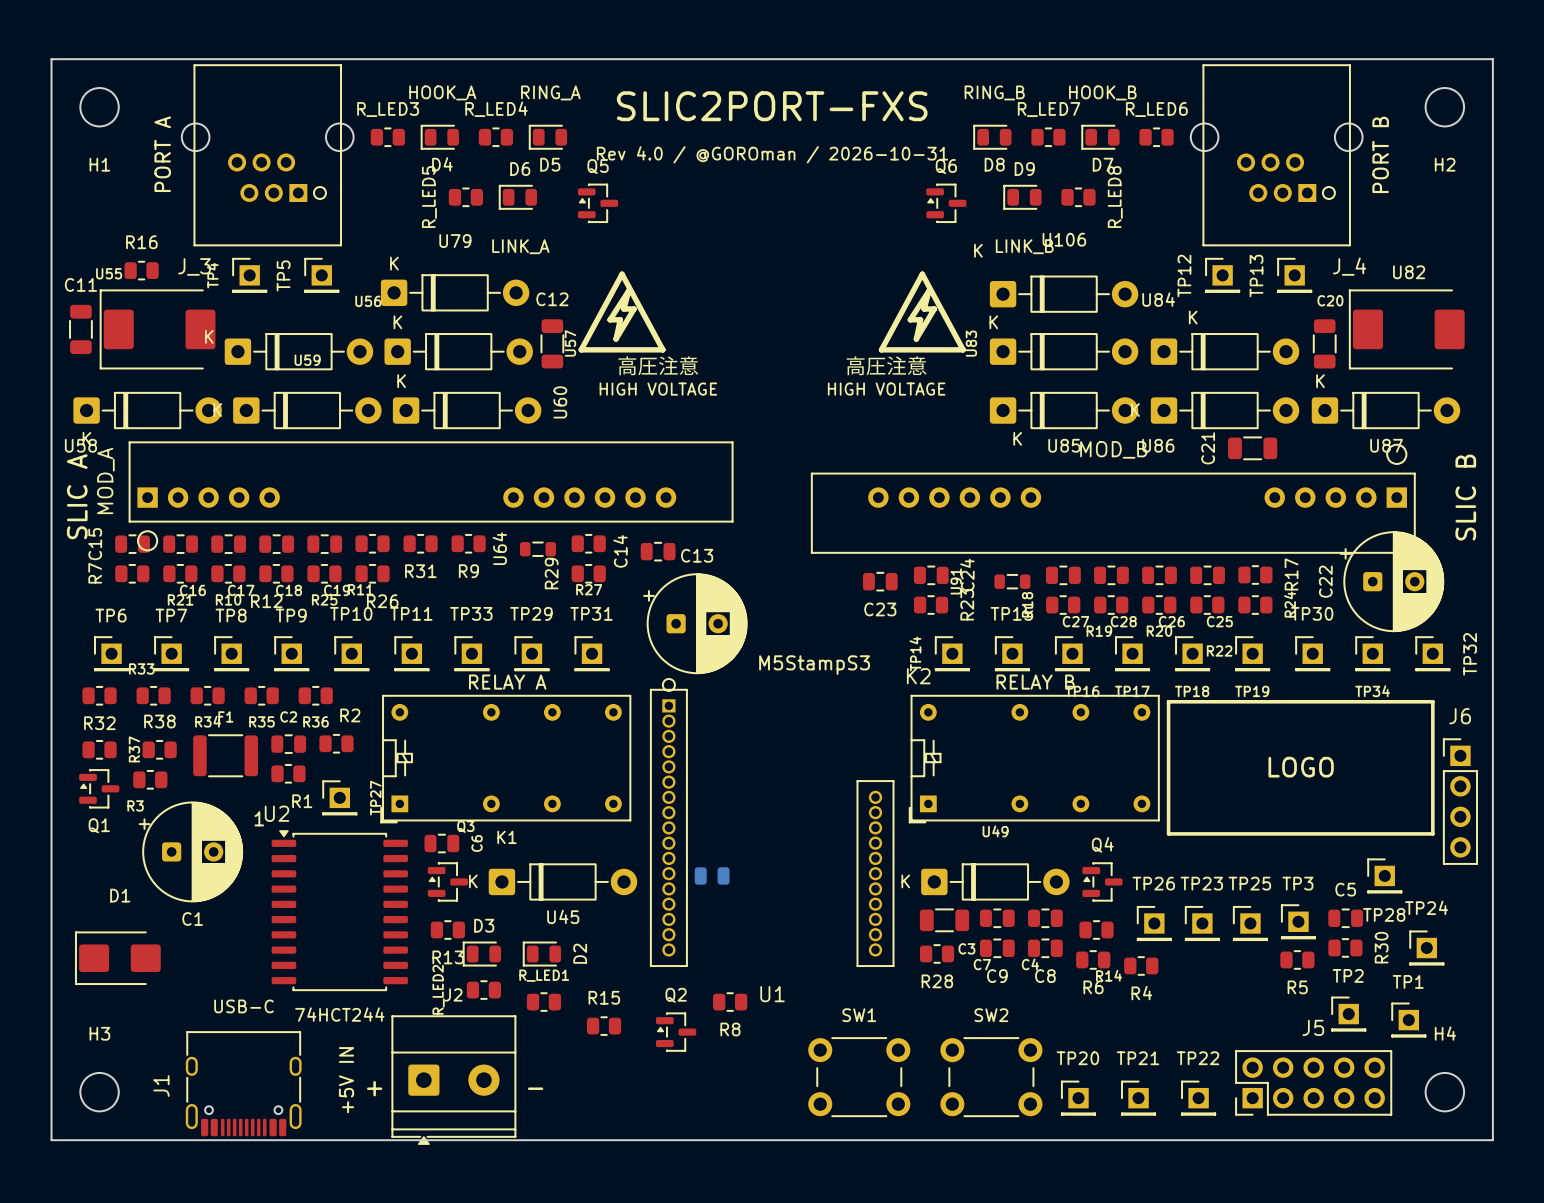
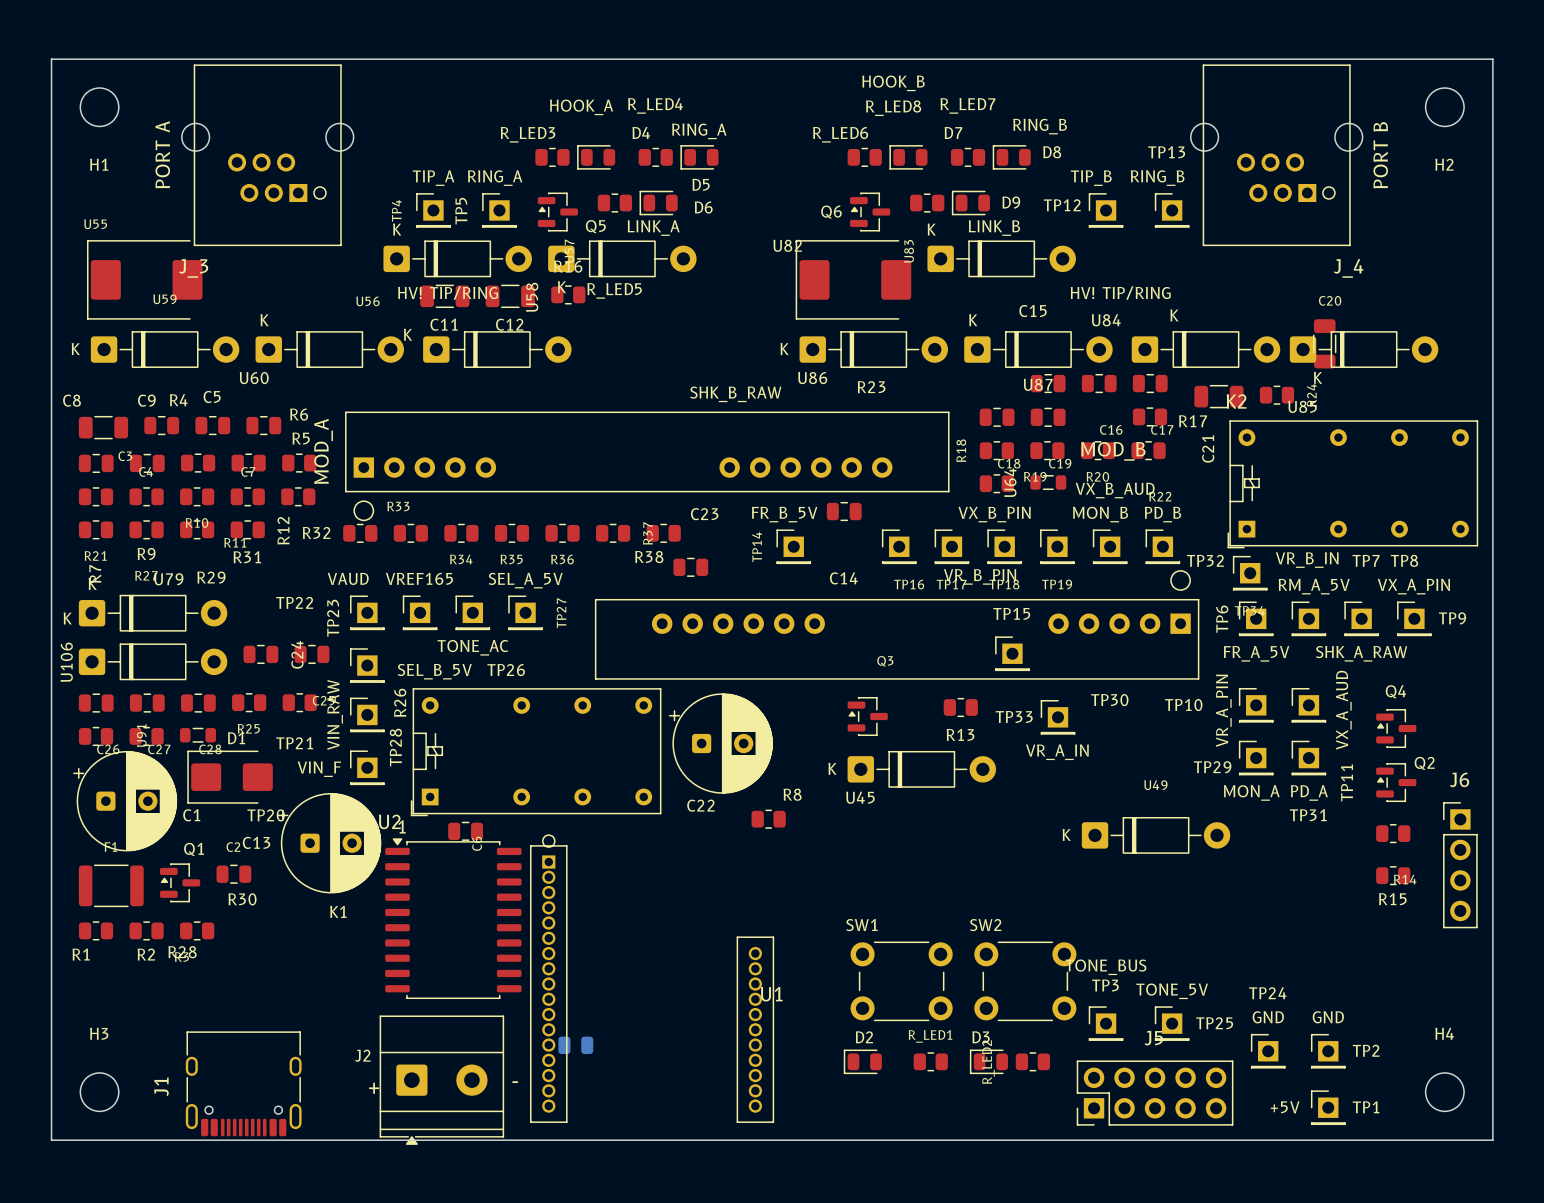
text position: HOOK_A (442, 92) -> HOOK_A (581, 107)
text position: RING_A (550, 92) -> RING_A (699, 131)
text position: RING_B (994, 92) -> RING_B (1040, 126)
text position: HOOK_B (1102, 92) -> HOOK_B (893, 83)
text: SLIC2PORT-FXS (772, 106) -> none
R_LED3 name position: R_LED3 (388, 109) -> R_LED3 (528, 134)
R_LED4 name position: R_LED4 (496, 109) -> R_LED4 (655, 105)
R_LED7 name position: R_LED7 (1049, 109) -> R_LED7 (967, 105)
R_LED6 name position: R_LED6 (1156, 109) -> R_LED6 (840, 134)
R_LED3 position: (387, 137) -> (552, 157)
D4 position: (439, 137) -> (596, 157)
R_LED4 position: (495, 137) -> (655, 157)
D5 position: (548, 137) -> (699, 157)
D8 position: (992, 137) -> (1011, 157)
R_LED7 position: (1048, 137) -> (968, 157)
D7 position: (1100, 137) -> (908, 157)
R_LED6 position: (1156, 137) -> (864, 157)
text: Rev 4.0 / @GOROman / 2026-10-31 (772, 154) -> none
D4 name position: D4 (442, 164) -> D4 (641, 132)
D8 name position: D8 (994, 164) -> D8 (1052, 152)
D7 name position: D7 (1103, 164) -> D7 (953, 132)
Q5 name position: Q5 (598, 166) -> Q5 (595, 226)
Q6 name position: Q6 (946, 166) -> Q6 (831, 212)
D6 name position: D6 (520, 168) -> D6 (703, 207)
D9 name position: D9 (1024, 168) -> D9 (1011, 202)
TP4 value: none -> TIP_A (433, 178)
TP5 value: none -> RING_A (495, 178)
TP12 value: none -> TIP_B (1091, 178)
TP13 value: none -> RING_B (1157, 178)
R_LED5 name rotation: 0° (429, 197) -> 90° clockwise (614, 290)
R_LED5 name position: R_LED5 (429, 197) -> R_LED5 (614, 290)
R_LED5 position: (465, 197) -> (614, 203)
D6 position: (518, 197) -> (658, 203)
D9 position: (1022, 197) -> (970, 203)
R_LED8 position: (1078, 197) -> (927, 203)
R_LED8 name rotation: 0° (1115, 197) -> 90° clockwise (893, 108)
R_LED8 name position: R_LED8 (1115, 197) -> R_LED8 (893, 108)
Q5 position: (598, 203) -> (557, 212)
Q6 position: (946, 203) -> (870, 212)
U106 name rotation: 0° (1064, 239) -> 90° counterclockwise (66, 662)
U106 name position: U106 (1064, 239) -> U106 (66, 662)
U79 name position: U79 (455, 241) -> U79 (168, 579)
text position: LINK_A (520, 246) -> LINK_A (653, 228)
text position: LINK_B (1024, 246) -> LINK_B (994, 228)
R16 position: (141, 270) -> (568, 294)
U82 name position: U82 (1409, 272) -> U82 (787, 245)
line: (622, 274) (581, 349) (662, 349) (622, 274) -> none
line: (922, 274) (881, 349) (963, 349) (922, 274) -> none
TP4 position: (249, 275) -> (433, 210)
TP5 position: (321, 275) -> (499, 210)
TP12 name rotation: 0° (1184, 275) -> 90° clockwise (1062, 205)
TP12 position: (1222, 275) -> (1106, 210)
TP13 name rotation: 0° (1256, 275) -> 90° clockwise (1166, 152)
TP13 name position: TP13 (1256, 275) -> TP13 (1166, 152)
TP13 position: (1294, 275) -> (1172, 210)
C11 name position: C11 (80, 284) -> C11 (444, 324)
line: (628, 291) (623, 309) (634, 309) (616, 339) (620, 319) (610, 319) (628, 291) -> none
line: (928, 291) (924, 309) (934, 309) (916, 339) (920, 319) (910, 319) (928, 291) -> none
U79 position: (455, 292) -> (153, 613)
text: none -> HV! TIP/RING (448, 293)
U106 position: (1064, 294) -> (153, 661)
text: none -> HV! TIP/RING (1120, 293)
C12 name position: C12 (552, 299) -> C12 (509, 324)
U84 name position: U84 (1158, 299) -> U84 (1106, 320)
C11 rotation: 0° (80, 329) -> 90° clockwise (444, 296)
C11 position: (80, 329) -> (444, 296)
U55 position: (157, 329) -> (144, 279)
U82 position: (1406, 329) -> (853, 279)
C12 rotation: 0° (552, 343) -> 90° clockwise (510, 296)
C12 position: (552, 343) -> (510, 296)
U56 position: (298, 351) -> (497, 349)
U57 position: (458, 351) -> (457, 258)
U83 position: (1064, 351) -> (1001, 258)
U84 position: (1225, 351) -> (1205, 349)
text: 高圧注意 (658, 365) -> none
text: 高圧注意 (886, 365) -> none
text: HIGH VOLTAGE (658, 389) -> none
text: HIGH VOLTAGE (886, 389) -> none
TP16 value: none -> SHK_B_RAW (735, 394)
U60 name rotation: 0° (560, 402) -> 90° clockwise (254, 378)
U60 name position: U60 (560, 402) -> U60 (254, 378)
U58 position: (147, 410) -> (622, 258)
U59 position: (307, 410) -> (165, 349)
U60 position: (467, 410) -> (329, 349)
U85 position: (1064, 410) -> (1364, 349)
U86 position: (1225, 410) -> (873, 349)
U87 position: (1385, 410) -> (1038, 349)
U58 name rotation: 0° (80, 445) -> 90° counterclockwise (532, 297)
U85 name position: U85 (1064, 445) -> U85 (1302, 406)
U86 name position: U86 (1158, 445) -> U86 (812, 378)
C21 position: (1252, 448) -> (1218, 396)
TP19 value: none -> VX_B_AUD (1115, 490)
text: SLIC A (77, 496) -> none
MOD_A position: (431, 496) -> (647, 466)
text: SLIC B (1465, 497) -> none
MOD_B position: (1113, 498) -> (897, 624)
TP14 value: none -> FR_B_5V (784, 514)
TP17 value: none -> VX_B_PIN (994, 514)
TP30 value: none -> MON_B (1100, 514)
TP32 value: none -> PD_B (1162, 514)
R11 position: (372, 543) -> (247, 496)
R31 position: (420, 543) -> (247, 529)
R9 position: (468, 543) -> (146, 496)
R27 position: (588, 543) -> (146, 529)
C15 name rotation: 0° (95, 544) -> 90° clockwise (1033, 311)
C15 name position: C15 (95, 544) -> C15 (1033, 311)
C15 position: (132, 544) -> (1048, 383)
C16 position: (180, 544) -> (1099, 383)
C17 position: (228, 544) -> (1150, 383)
C18 position: (276, 544) -> (997, 417)
C19 position: (324, 544) -> (1048, 417)
U64 position: (537, 549) -> (1048, 482)
C14 name rotation: 0° (620, 551) -> 90° clockwise (843, 578)
C14 name position: C14 (620, 551) -> C14 (843, 578)
C14 position: (658, 551) -> (844, 511)
C13 name position: C13 (697, 555) -> C13 (256, 842)
TP34 value: none -> VR_B_IN (1307, 560)
R9 name position: R9 (468, 571) -> R9 (146, 554)
R7 position: (132, 573) -> (96, 496)
R21 position: (180, 573) -> (96, 529)
R10 position: (228, 573) -> (197, 496)
R12 position: (276, 573) -> (298, 496)
R25 position: (324, 573) -> (249, 702)
R26 position: (372, 573) -> (299, 702)
R29 name rotation: 0° (551, 573) -> 90° clockwise (211, 577)
R29 name position: R29 (551, 573) -> R29 (211, 577)
R29 position: (588, 573) -> (197, 529)
R17 name rotation: 0° (1291, 574) -> 90° clockwise (1193, 421)
C24 position: (931, 575) -> (260, 654)
TP18 value: none -> VR_B_PIN (980, 576)
C27 position: (1063, 575) -> (147, 703)
C28 position: (1111, 575) -> (198, 703)
C26 position: (1159, 575) -> (96, 703)
C25 position: (1207, 575) -> (311, 654)
R17 position: (1255, 575) -> (1150, 416)
TP22 value: none -> VAUD (348, 578)
TP23 value: none -> VREF165 (419, 578)
TP27 value: none -> SEL_A_5V (525, 580)
C23 position: (880, 581) -> (690, 567)
U91 position: (1012, 581) -> (198, 735)
C22 name rotation: 0° (1325, 581) -> 90° clockwise (700, 805)
C22 name position: C22 (1325, 581) -> C22 (700, 805)
C22 position: (1392, 581) -> (720, 743)
TP7 value: none -> RM_A_5V (1314, 586)
TP9 value: none -> VX_A_PIN (1413, 586)
R12 name rotation: 0° (266, 601) -> 90° counterclockwise (283, 530)
R26 name rotation: 0° (382, 601) -> 90° counterclockwise (400, 702)
R26 name position: R26 (382, 601) -> R26 (400, 702)
R23 name rotation: 0° (967, 604) -> 90° clockwise (871, 387)
R23 name position: R23 (967, 604) -> R23 (871, 387)
R23 position: (931, 605) -> (996, 483)
R18 position: (1063, 605) -> (996, 450)
R19 position: (1111, 605) -> (1047, 450)
R20 position: (1159, 605) -> (1098, 450)
R22 position: (1207, 605) -> (1148, 450)
R24 position: (1255, 605) -> (1276, 395)
C23 name position: C23 (880, 609) -> C23 (704, 514)
TP10 name position: TP10 (351, 613) -> TP10 (1183, 705)
TP11 name rotation: 0° (411, 613) -> 90° counterclockwise (1346, 782)
TP11 name position: TP11 (411, 613) -> TP11 (1346, 782)
TP33 name position: TP33 (471, 613) -> TP33 (1014, 716)
TP29 name position: TP29 (531, 613) -> TP29 (1212, 767)
TP31 name position: TP31 (591, 613) -> TP31 (1308, 815)
TP30 name position: TP30 (1312, 613) -> TP30 (1109, 700)
TP6 name rotation: 0° (111, 615) -> 90° counterclockwise (1222, 619)
TP6 name position: TP6 (111, 615) -> TP6 (1222, 619)
TP7 name position: TP7 (171, 615) -> TP7 (1366, 560)
TP8 name position: TP8 (231, 615) -> TP8 (1404, 560)
TP9 name position: TP9 (291, 615) -> TP9 (1452, 618)
C13 position: (695, 623) -> (329, 843)
TP26 value: none -> TONE_AC (472, 647)
TP6 value: none -> FR_A_5V (1256, 653)
TP8 value: none -> SHK_A_RAW (1361, 653)
TP6 position: (111, 653) -> (1256, 618)
TP7 position: (171, 653) -> (1308, 618)
TP8 position: (231, 653) -> (1361, 618)
TP9 position: (291, 653) -> (1414, 618)
TP10 position: (351, 653) -> (1256, 705)
TP11 position: (411, 653) -> (1308, 705)
TP33 position: (471, 653) -> (1058, 717)
TP29 position: (531, 653) -> (1256, 758)
TP31 position: (592, 653) -> (1308, 758)
TP14 position: (952, 653) -> (793, 546)
TP16 position: (1072, 653) -> (899, 546)
TP17 position: (1132, 653) -> (951, 546)
TP18 position: (1192, 653) -> (1004, 546)
TP19 position: (1252, 653) -> (1057, 546)
TP30 position: (1312, 653) -> (1110, 546)
TP34 position: (1372, 653) -> (1250, 573)
TP32 position: (1432, 653) -> (1162, 546)
TP32 name rotation: 0° (1470, 654) -> 90° clockwise (1205, 560)
text: M5StampS3 (814, 665) -> none
TP28 value: none -> SEL_B_5V (434, 671)
text: RELAY A (507, 682) -> none
text: RELAY B (1035, 682) -> none
R32 position: (99, 695) -> (360, 533)
R33 position: (153, 695) -> (410, 533)
R34 position: (207, 695) -> (461, 533)
R35 position: (261, 695) -> (511, 533)
R36 position: (315, 695) -> (562, 533)
line: (1168, 701) (1432, 701) (1432, 833) (1168, 833) (1168, 701) -> none
TP11 value: none -> VX_A_AUD (1343, 710)
TP10 value: none -> VR_A_PIN (1223, 710)
TP20 value: none -> VIN_RAW (335, 714)
R2 name position: R2 (350, 715) -> R2 (146, 954)
R38 name position: R38 (159, 721) -> R38 (649, 557)
R32 name position: R32 (99, 723) -> R32 (316, 532)
R2 position: (336, 743) -> (146, 930)
C2 position: (288, 744) -> (233, 874)
R37 position: (99, 749) -> (613, 533)
R38 position: (159, 749) -> (663, 533)
TP33 value: none -> VR_A_IN (1057, 752)
F1 position: (225, 755) -> (111, 885)
K1 position: (505, 759) -> (536, 752)
K2 position: (1034, 759) -> (1352, 484)
TP21 value: none -> VIN_F (319, 769)
text: LOGO (1301, 767) -> none
R1 position: (288, 773) -> (96, 930)
R3 position: (150, 779) -> (197, 930)
Q1 position: (99, 788) -> (180, 882)
TP29 value: none -> MON_A (1251, 792)
TP31 value: none -> PD_A (1309, 792)
TP27 position: (339, 797) -> (525, 612)
R1 name position: R1 (302, 801) -> R1 (81, 954)
J6 position: (1460, 801) -> (1460, 865)
text position: 1 (259, 818) -> 1 (402, 826)
U1 position: (772, 822) -> (652, 978)
Q1 name position: Q1 (99, 825) -> Q1 (194, 849)
K1 name position: K1 (507, 837) -> K1 (338, 911)
C6 position: (441, 843) -> (465, 831)
C1 position: (190, 851) -> (125, 801)
part position: (712, 875) -> (575, 1045)
TP28 position: (1384, 875) -> (367, 665)
Q3 position: (447, 881) -> (867, 716)
U45 position: (562, 881) -> (921, 769)
U49 position: (995, 881) -> (1156, 835)
Q4 position: (1102, 881) -> (1396, 728)
TP26 name position: TP26 (1153, 883) -> TP26 (506, 670)
TP23 name rotation: 0° (1201, 883) -> 90° counterclockwise (333, 618)
TP23 name position: TP23 (1201, 883) -> TP23 (333, 618)
TP25 name position: TP25 (1249, 883) -> TP25 (1214, 1023)
D1 name position: D1 (120, 895) -> D1 (236, 738)
TP24 name position: TP24 (1426, 907) -> TP24 (1267, 993)
U2 position: (339, 910) -> (453, 918)
TP28 name rotation: 0° (1384, 914) -> 90° counterclockwise (395, 747)
U45 name position: U45 (563, 916) -> U45 (860, 797)
C7 position: (997, 918) -> (263, 425)
C4 position: (1045, 918) -> (161, 425)
C5 position: (1345, 918) -> (212, 425)
C1 name position: C1 (192, 919) -> C1 (191, 815)
C3 position: (944, 920) -> (103, 427)
TP3 position: (1298, 921) -> (1106, 1023)
TP26 position: (1154, 923) -> (472, 612)
TP23 position: (1202, 923) -> (420, 612)
TP25 position: (1250, 923) -> (1172, 1023)
D3 name position: D3 (484, 925) -> D3 (981, 1037)
R13 position: (447, 930) -> (960, 707)
R14 position: (1096, 930) -> (1393, 833)
R30 position: (1345, 947) -> (146, 736)
R30 name rotation: 0° (1381, 947) -> 90° clockwise (242, 899)
R30 name position: R30 (1381, 947) -> R30 (242, 899)
C9 position: (997, 948) -> (147, 463)
C8 position: (1045, 948) -> (96, 463)
TP24 position: (1426, 948) -> (1268, 1051)
D2 name rotation: 0° (580, 953) -> 90° clockwise (864, 1037)
D2 name position: D2 (580, 953) -> D2 (864, 1037)
R28 position: (937, 953) -> (96, 736)
D3 position: (482, 954) -> (988, 1061)
D2 position: (542, 954) -> (862, 1061)
D1 position: (118, 958) -> (230, 777)
R6 position: (1093, 959) -> (299, 463)
R5 position: (1297, 959) -> (248, 463)
R4 position: (1141, 965) -> (198, 463)
TP3 value: none -> TONE_BUS (1105, 967)
TP2 name position: TP2 (1348, 975) -> TP2 (1366, 1050)
C9 name position: C9 (997, 976) -> C9 (146, 400)
C8 name position: C8 (1045, 976) -> C8 (71, 400)
R28 name position: R28 (937, 981) -> R28 (182, 952)
TP1 name position: TP1 (1408, 981) -> TP1 (1366, 1107)
R6 name position: R6 (1093, 987) -> R6 (299, 414)
R5 name position: R5 (1297, 987) -> R5 (301, 438)
R_LED2 position: (483, 990) -> (1032, 1061)
TP25 value: none -> TONE_5V (1172, 991)
R4 name position: R4 (1141, 993) -> R4 (178, 400)
J2 name position: J2 (453, 994) -> J2 (362, 1055)
Q2 name position: Q2 (676, 995) -> Q2 (1424, 763)
R15 name position: R15 (604, 997) -> R15 (1392, 899)
R_LED1 position: (543, 1002) -> (930, 1061)
R8 position: (730, 1002) -> (768, 819)
text: USB-C (243, 1006) -> none
text: 74HCT244 (339, 1014) -> none
TP2 position: (1348, 1014) -> (1328, 1051)
SW1 name position: SW1 (859, 1015) -> SW1 (861, 925)
SW2 name position: SW2 (991, 1015) -> SW2 (985, 925)
TP24 value: none -> GND (1268, 1017)
TP2 value: none -> GND (1328, 1017)
TP1 position: (1408, 1020) -> (1328, 1107)
R15 position: (604, 1026) -> (1393, 875)
R8 name position: R8 (730, 1029) -> R8 (792, 794)
Q2 position: (676, 1032) -> (1396, 782)
TP20 name position: TP20 (1077, 1058) -> TP20 (266, 815)
TP21 name position: TP21 (1137, 1058) -> TP21 (294, 743)
TP22 name position: TP22 (1198, 1058) -> TP22 (294, 602)
SW1 position: (859, 1077) -> (901, 981)
SW2 position: (991, 1077) -> (1025, 981)
text: +5V IN (346, 1080) -> none
J2 position: (453, 1080) -> (441, 1080)
J5 position: (1313, 1082) -> (1155, 1093)
text position: - (535, 1088) -> - (515, 1082)
TP20 position: (1078, 1098) -> (367, 714)
TP21 position: (1138, 1098) -> (367, 767)
TP22 position: (1198, 1098) -> (367, 612)
TP1 value: none -> +5V (1285, 1107)

